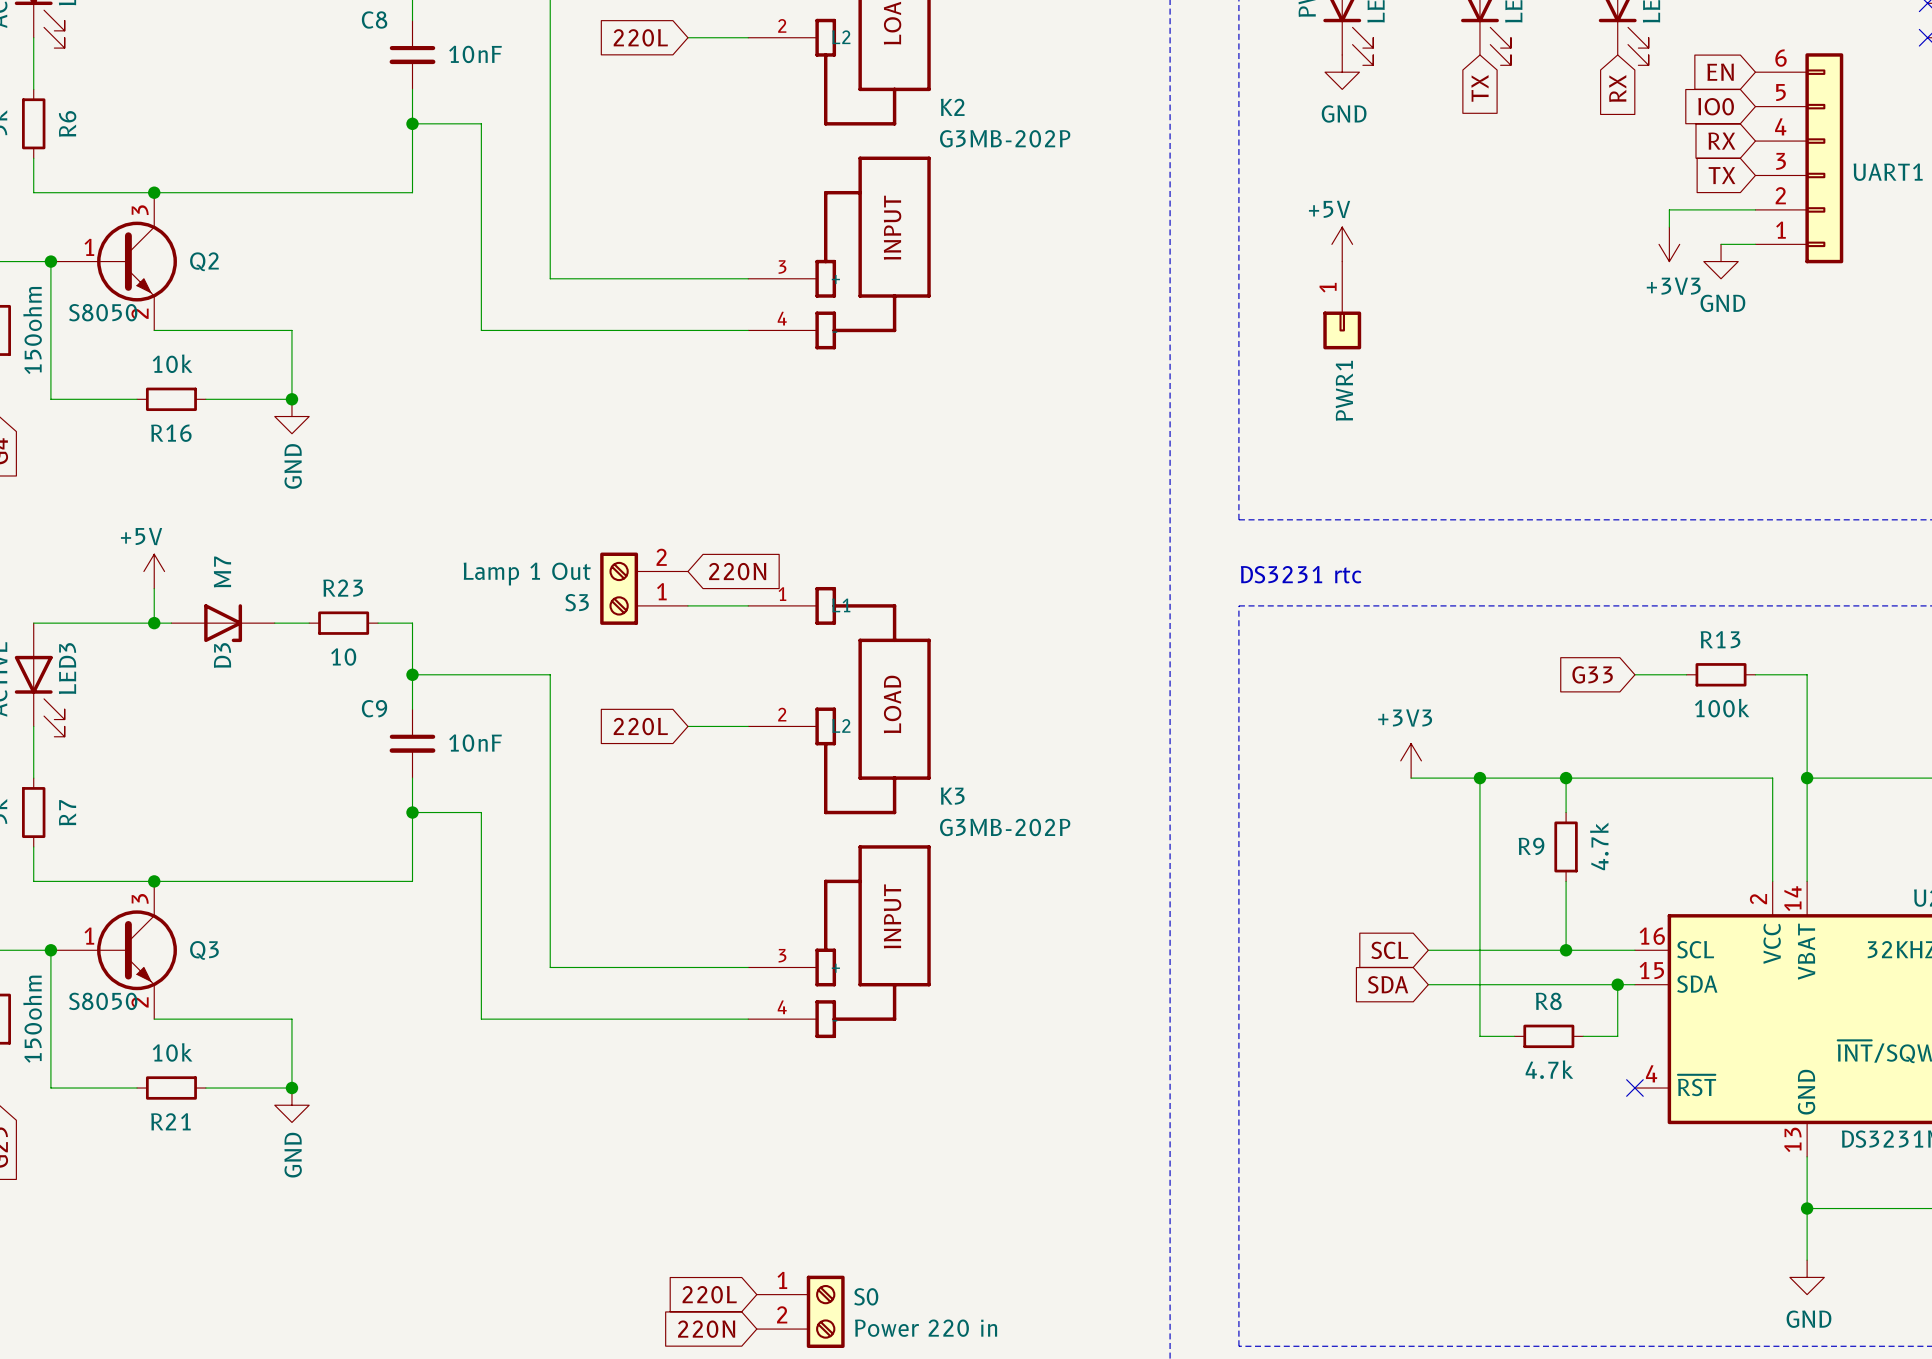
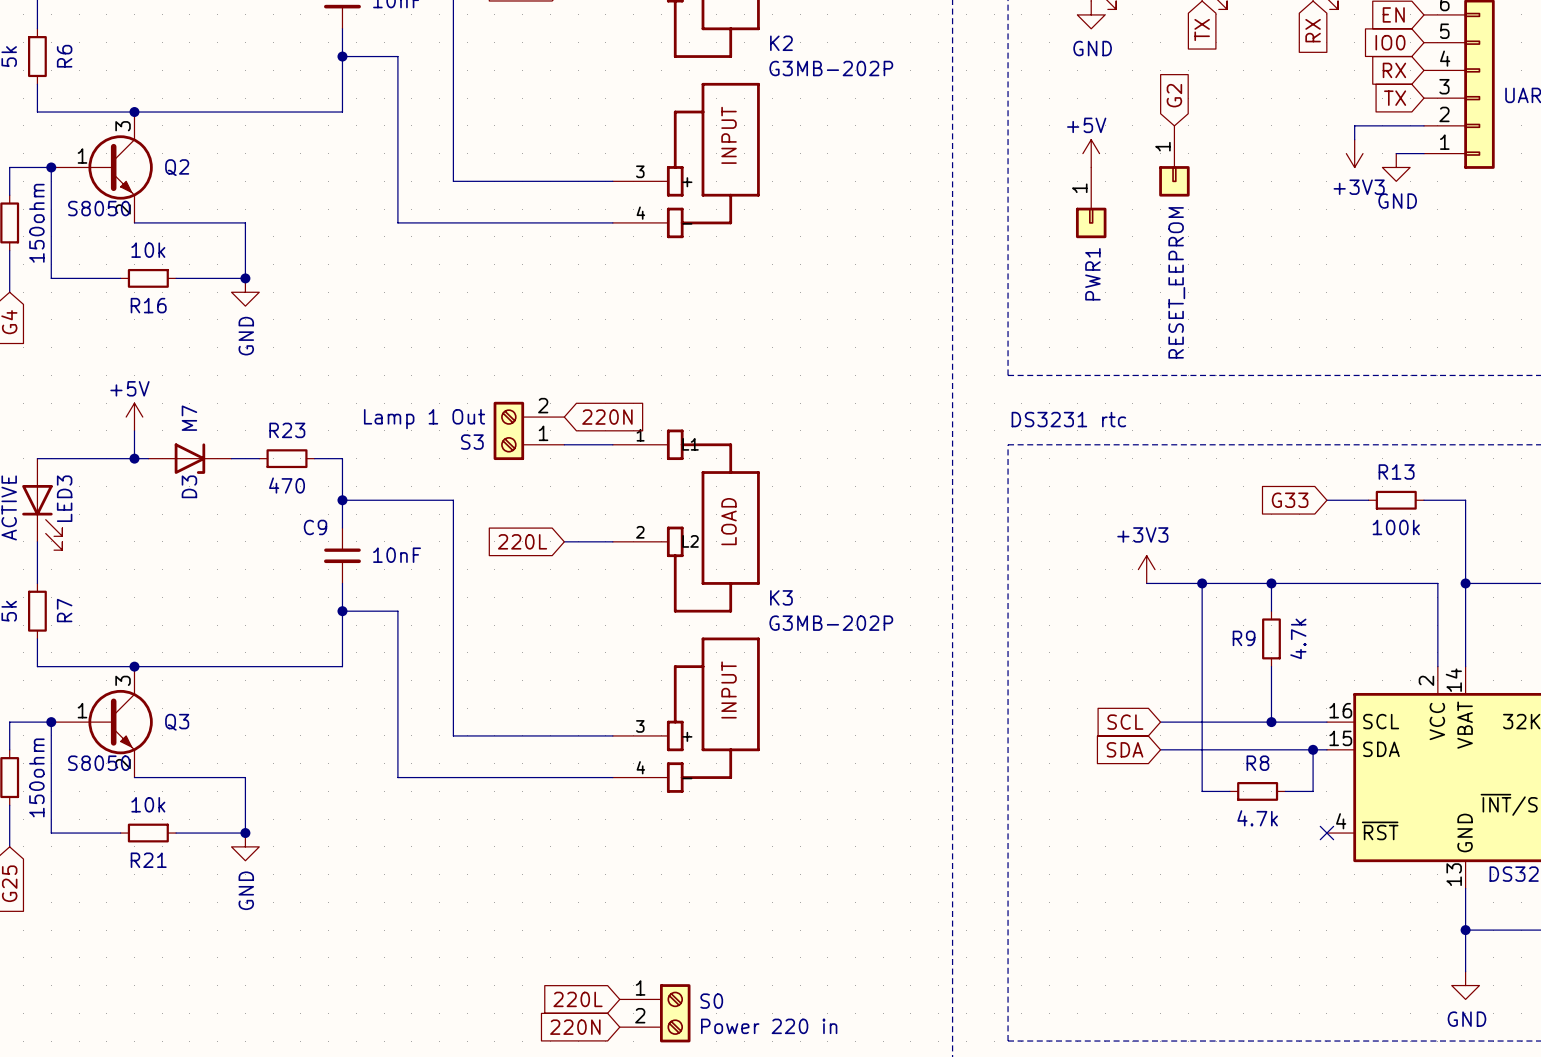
global label: none -> G2 (1174, 95)
RESET_EEPROM: none -> (1174, 161)
R23 value: 10 (343, 657) -> 470 (287, 485)

